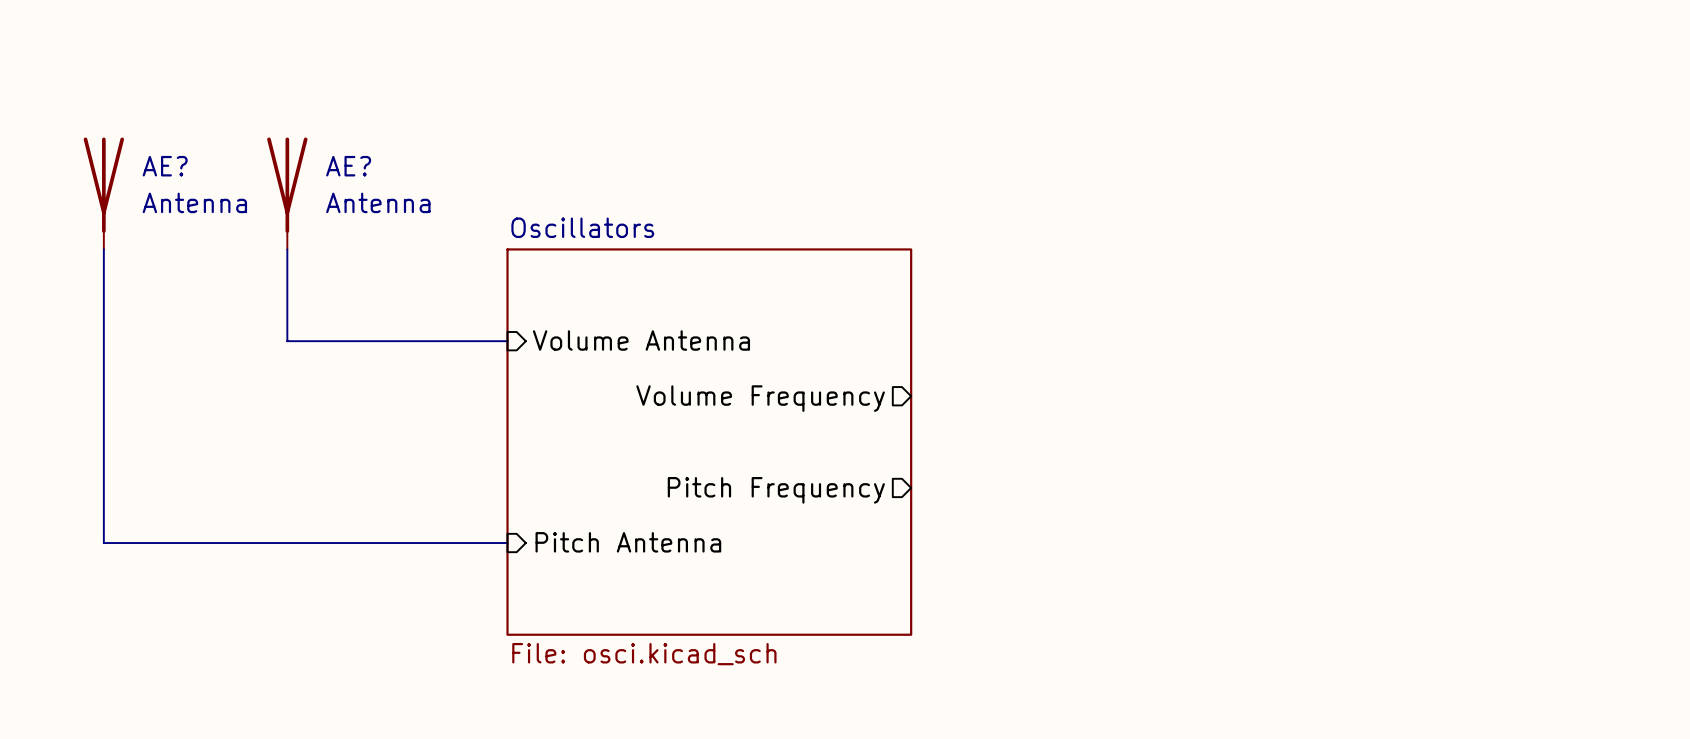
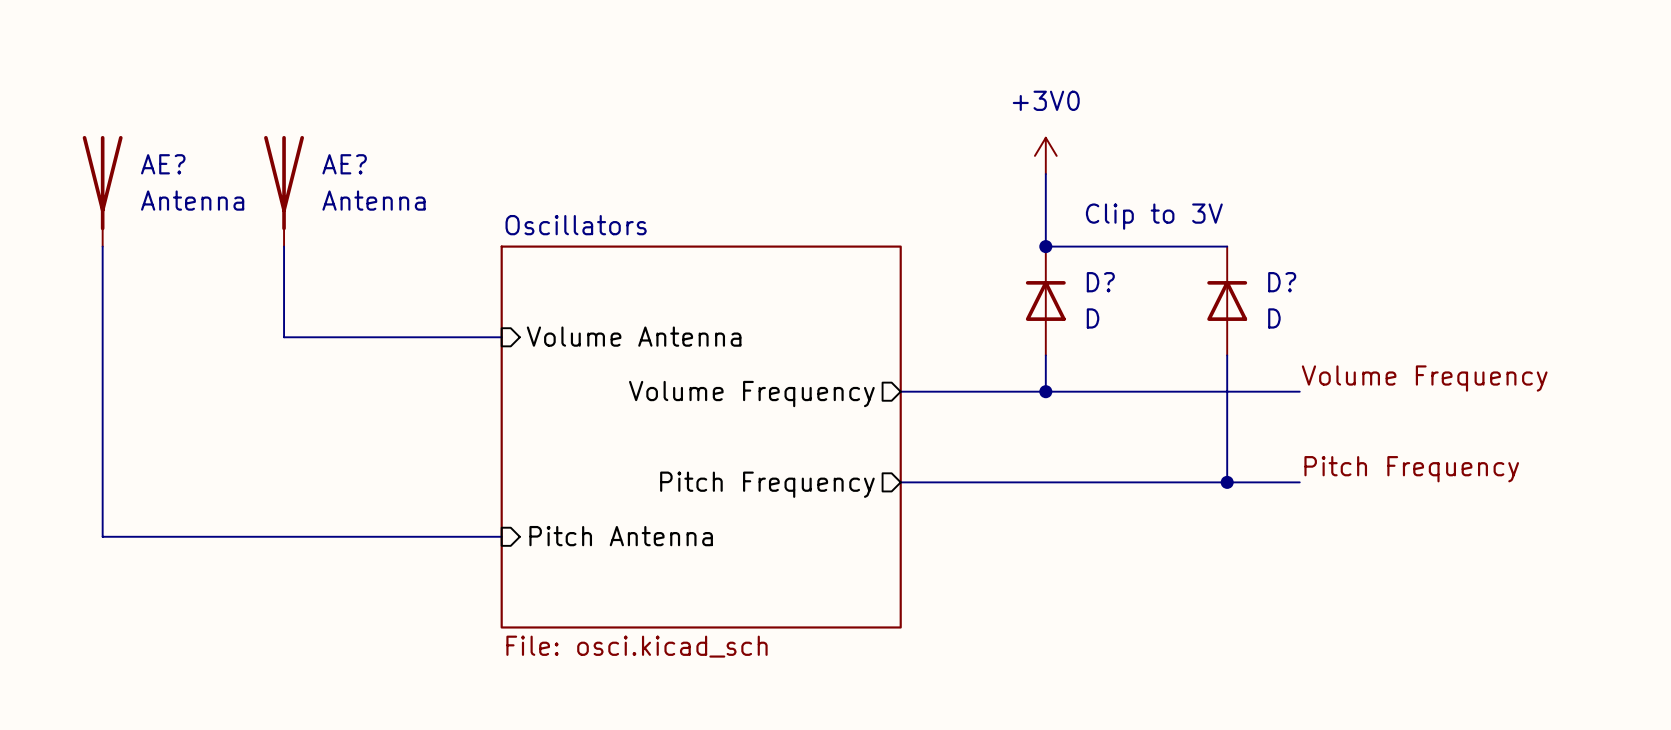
power symbol: none -> +3V0 (1045, 155)
wire: none -> (1045, 174) (1045, 246) (1227, 246)
text: none -> Clip to 3V (1154, 216)
junction: none -> (1045, 246)
D?: none -> D (1045, 301)
D?: none -> D (1227, 301)
wire: none -> (1045, 355) (1045, 391)
wire: none -> (1227, 355) (1227, 482)
label: none -> Volume Frequency (1424, 378)
wire: none -> (900, 391) (1299, 391)
junction: none -> (1045, 391)
label: none -> Pitch Frequency (1411, 469)
wire: none -> (900, 482) (1299, 482)
junction: none -> (1227, 482)

